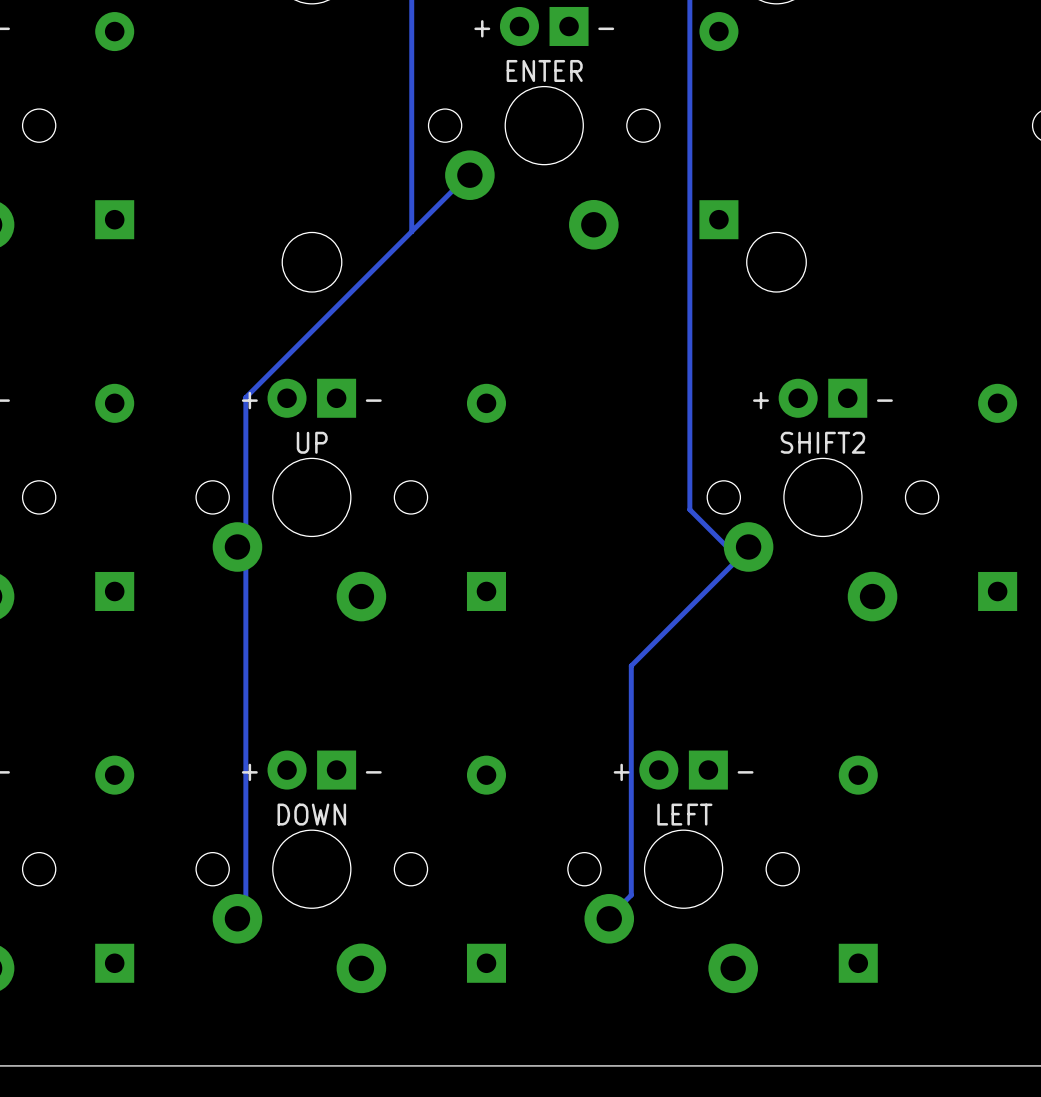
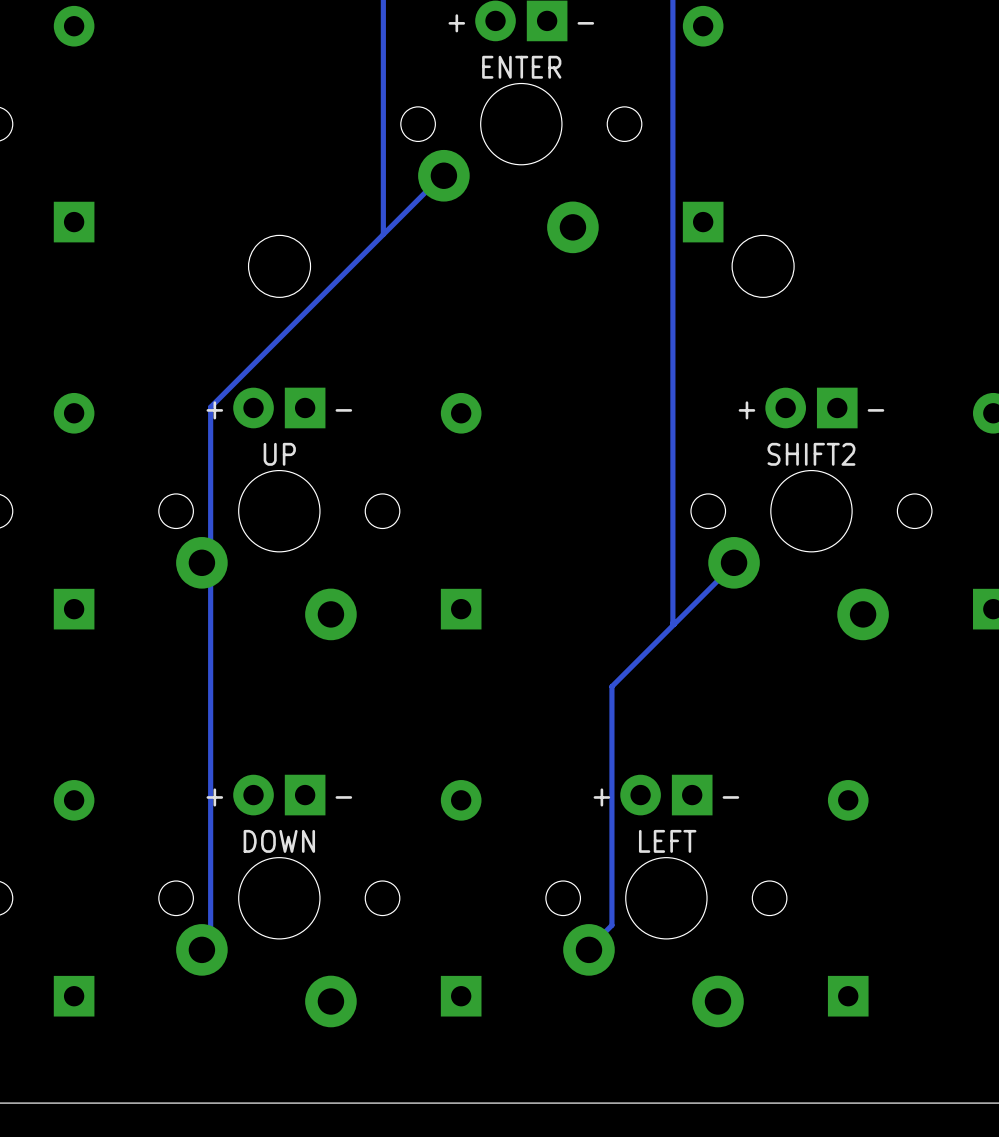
track: (689, 509) (738, 558) (748, 546) -> (672, 524) (674, 624)

